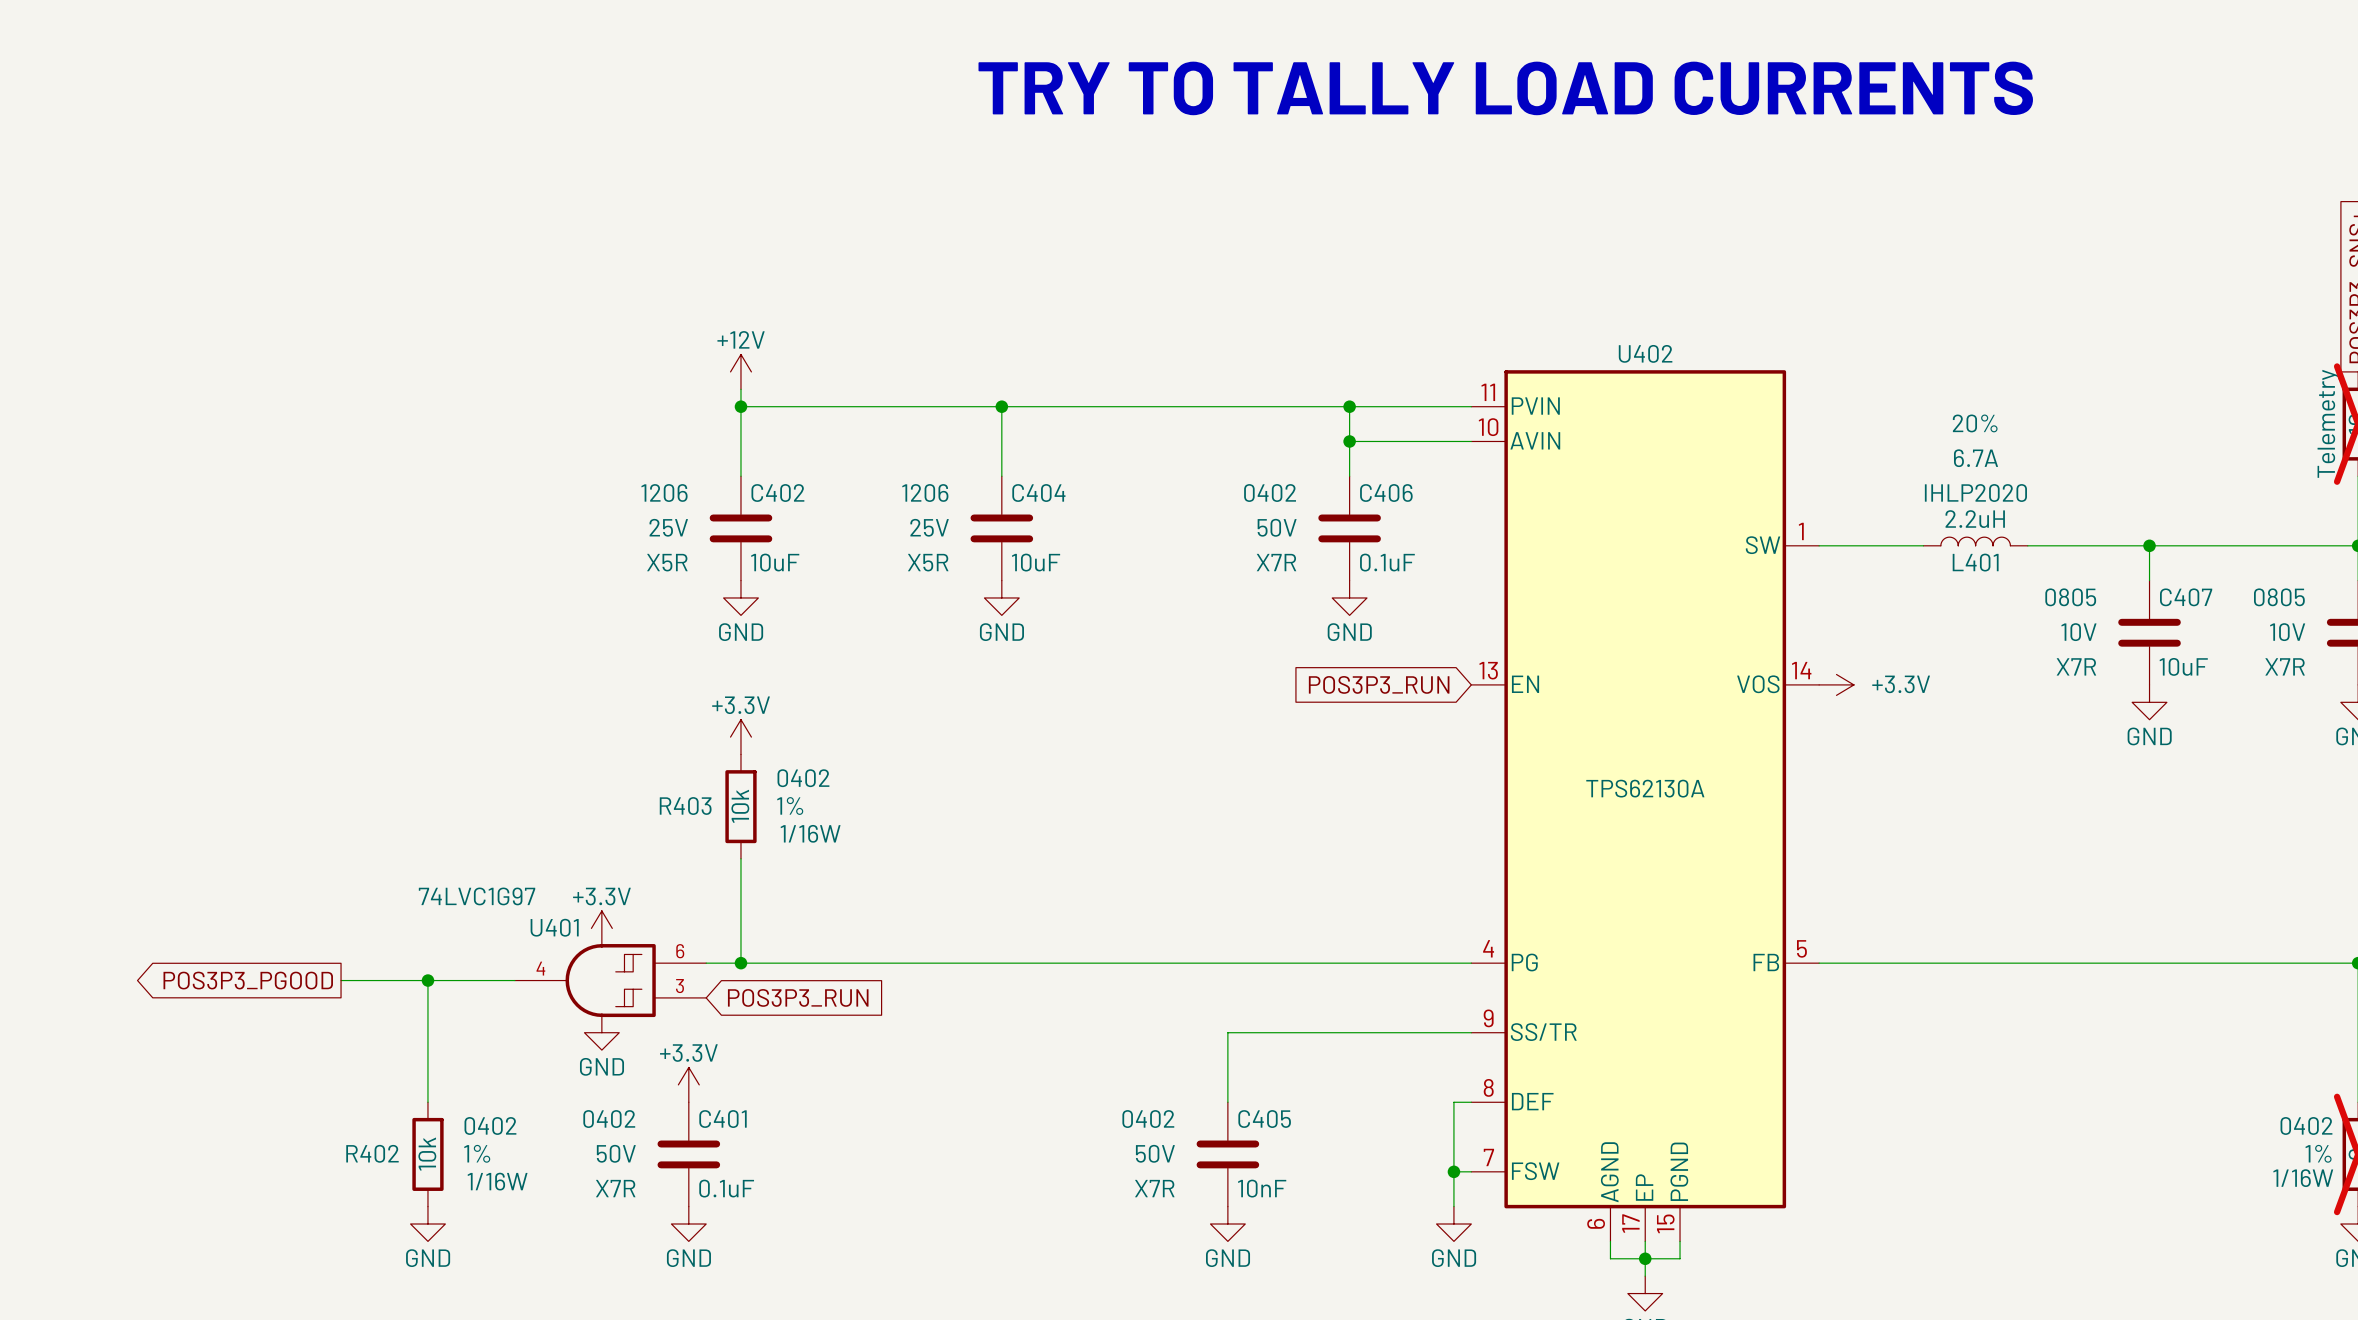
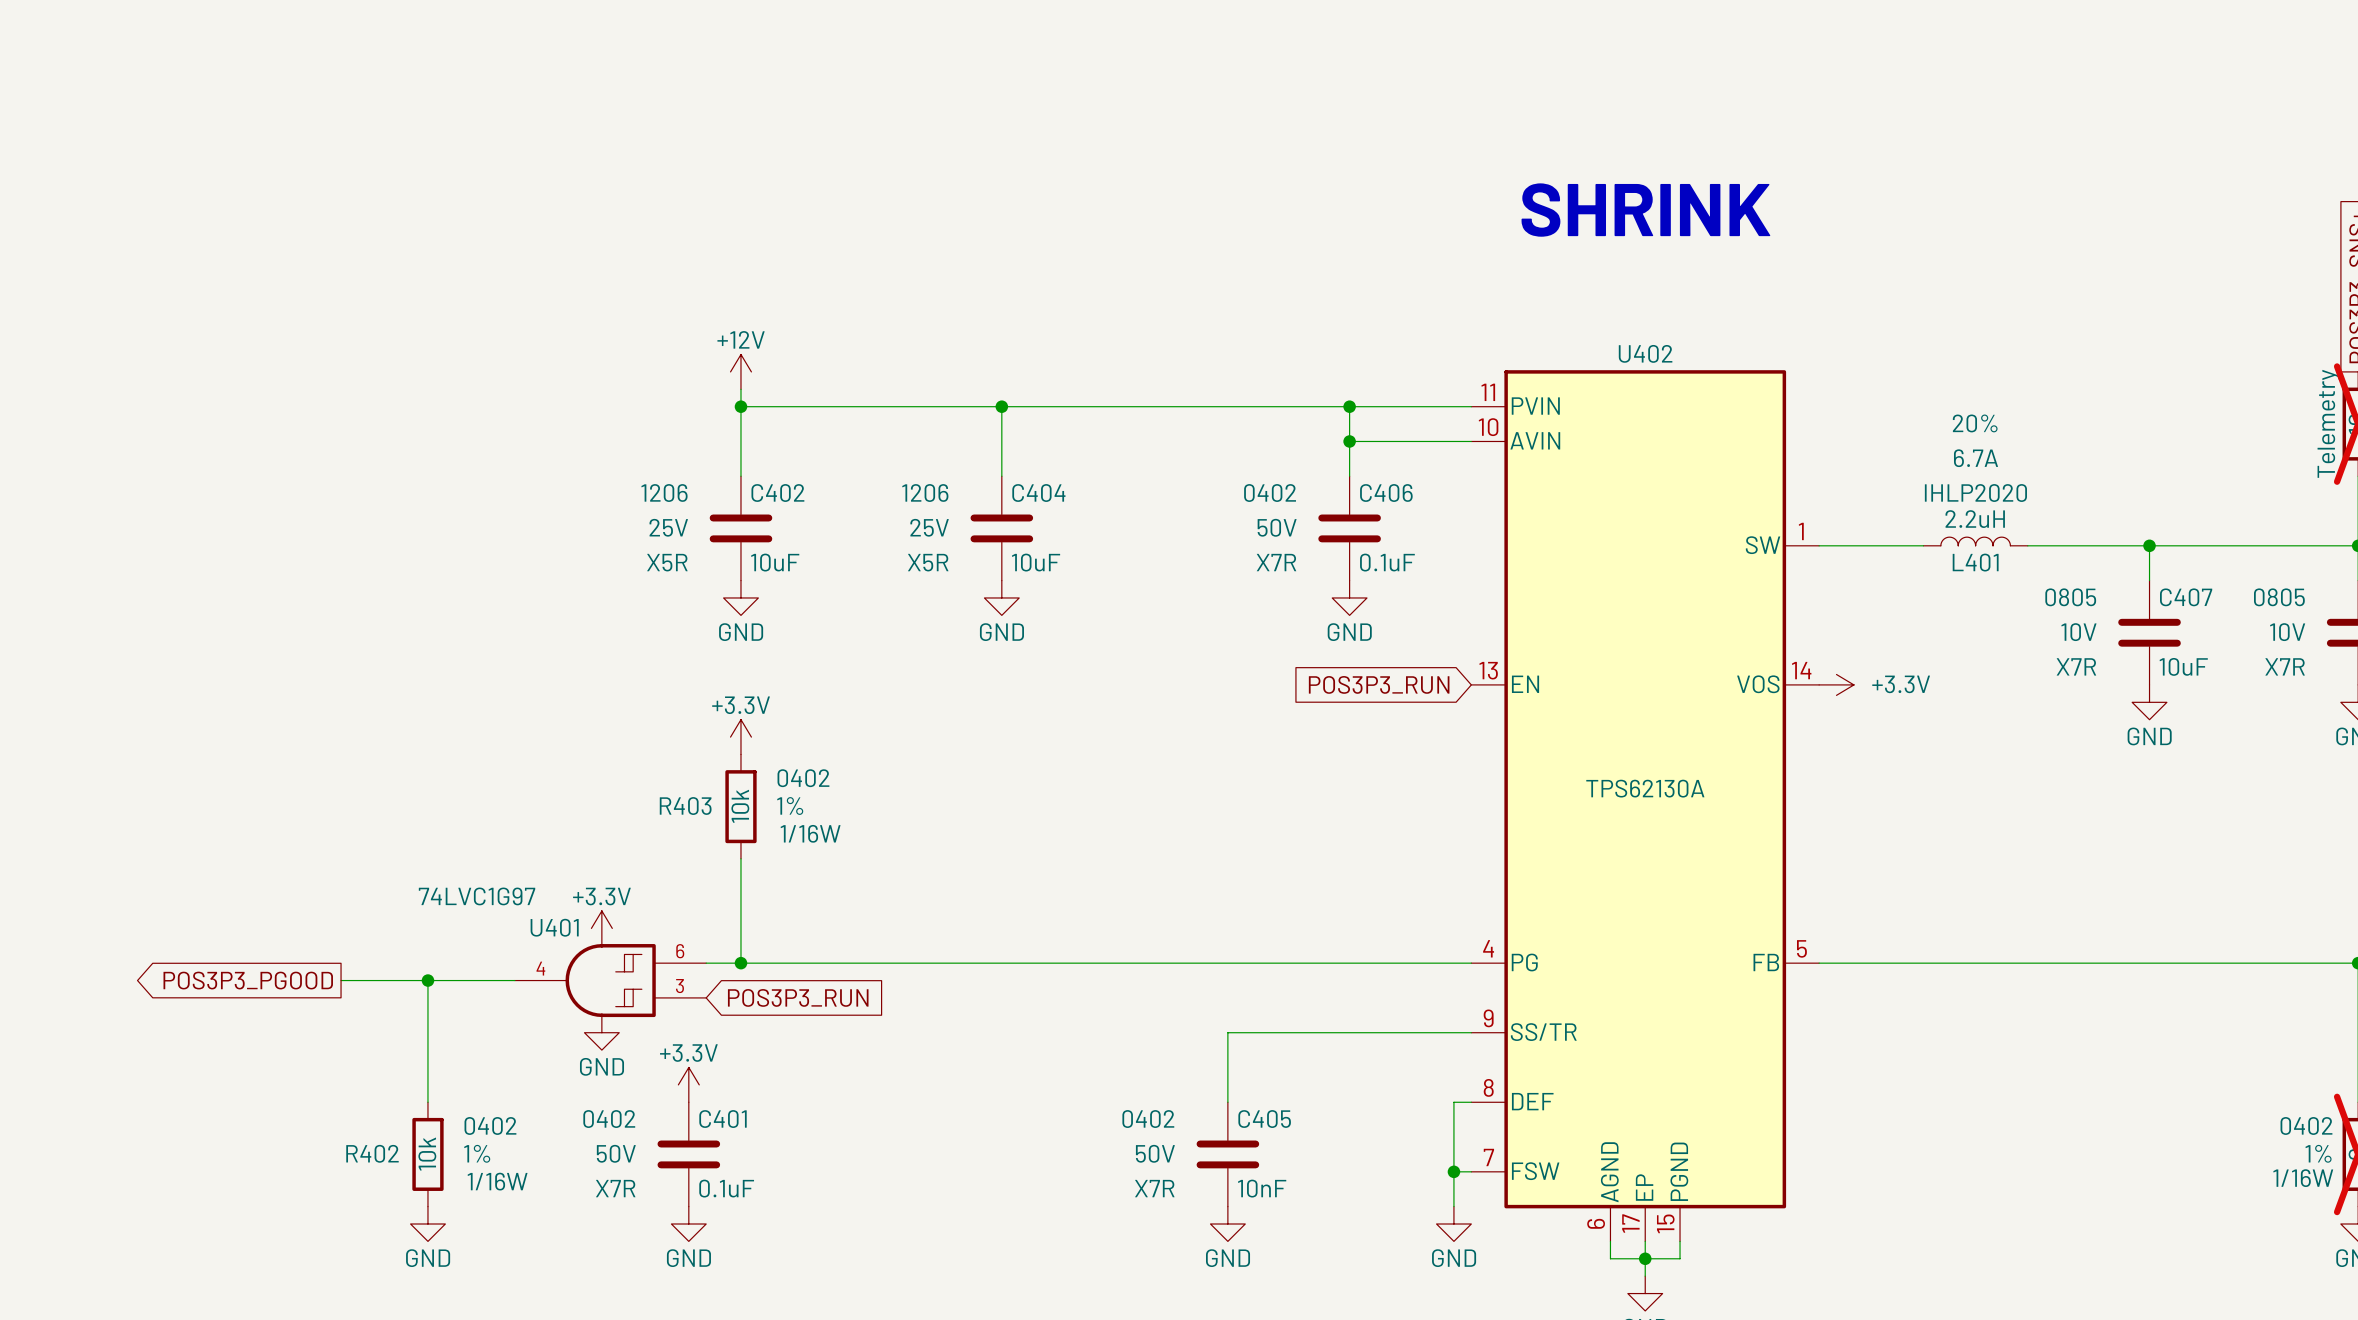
text: TRY TO TALLY LOAD CURRENTS (1505, 88) -> none
text: none -> SHRINK (1645, 210)

